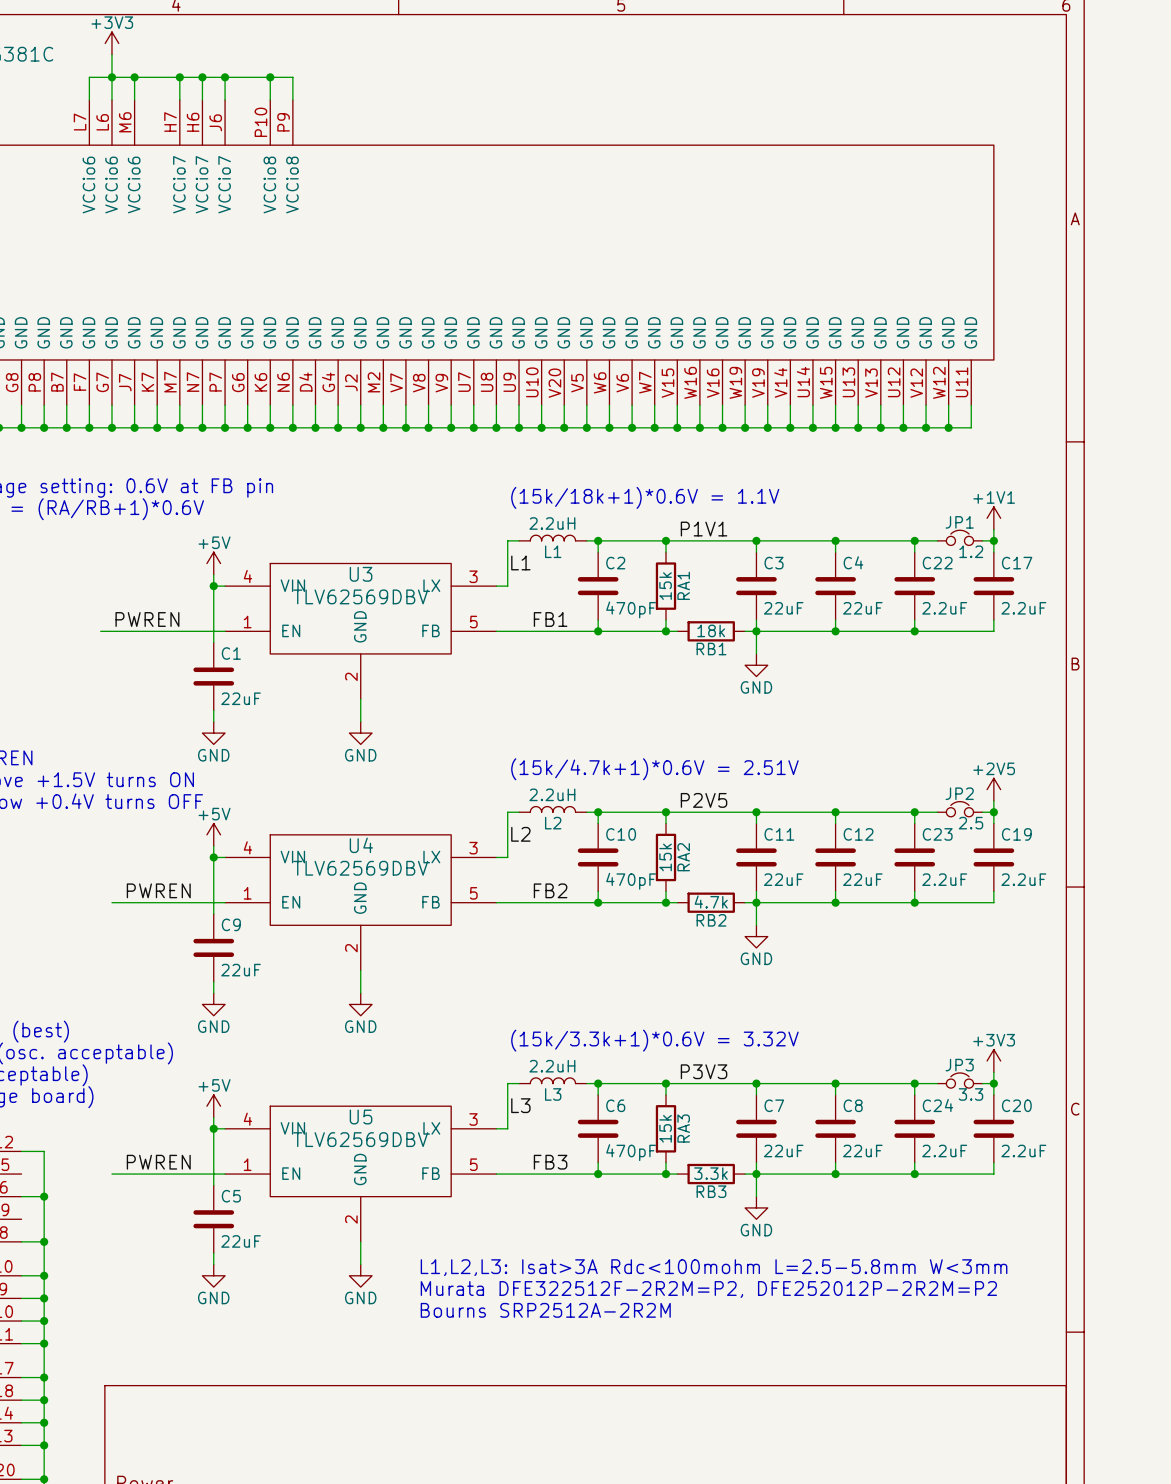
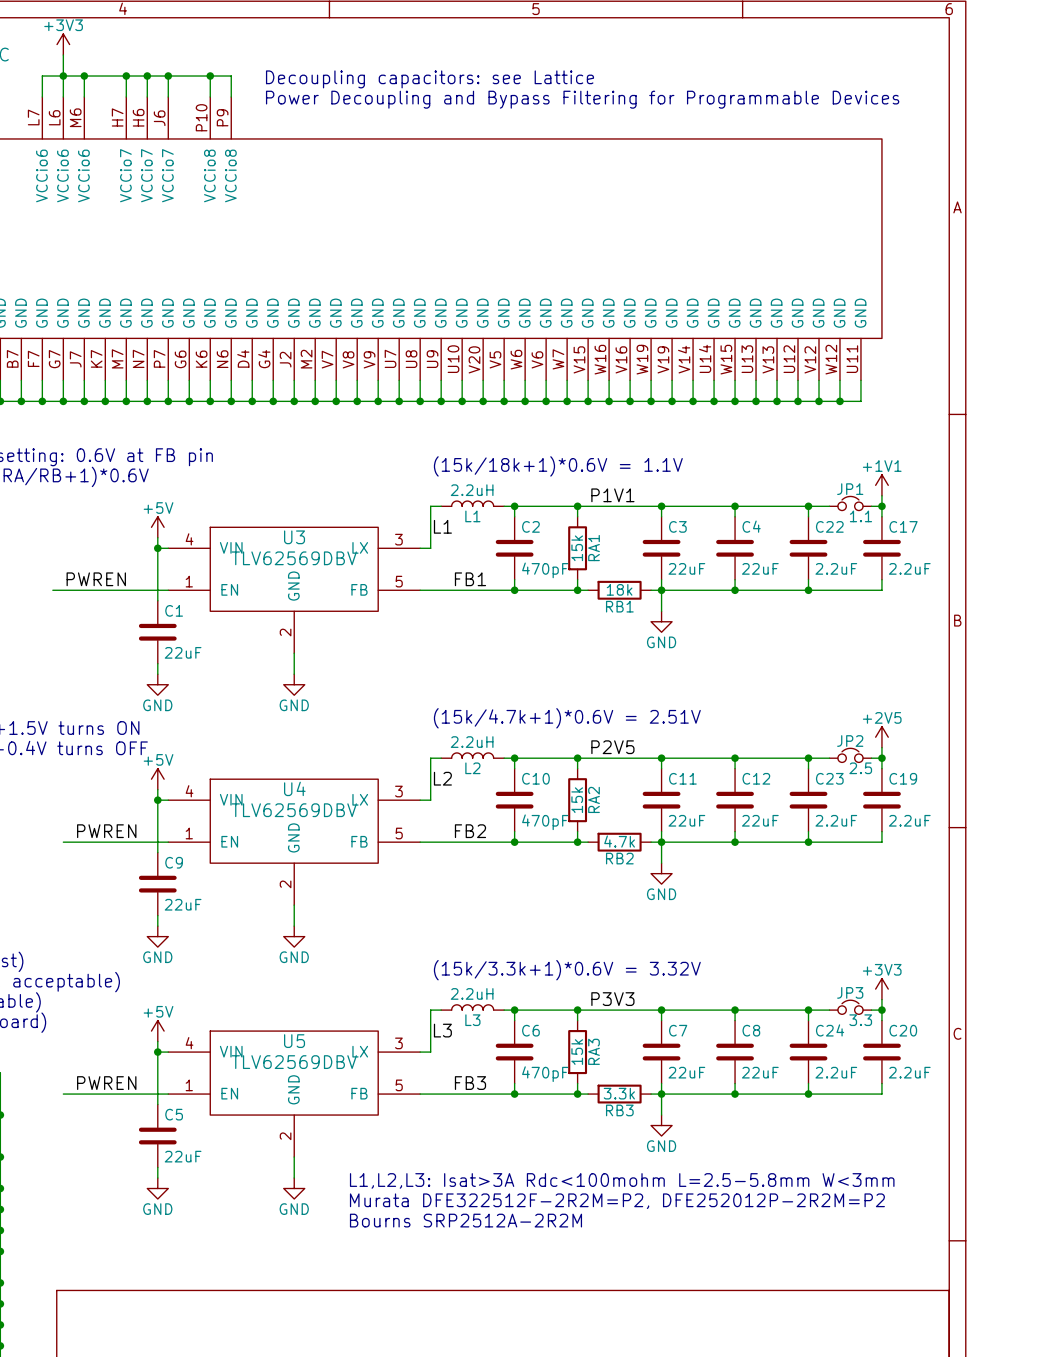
text: none -> Decoupling capacitors: see Lattice (430, 79)
text: none -> Power Decoupling and Bypass Filtering for Programmable Devices (582, 99)
JP1 value: 1.2 (971, 551) -> 1.1 (860, 516)

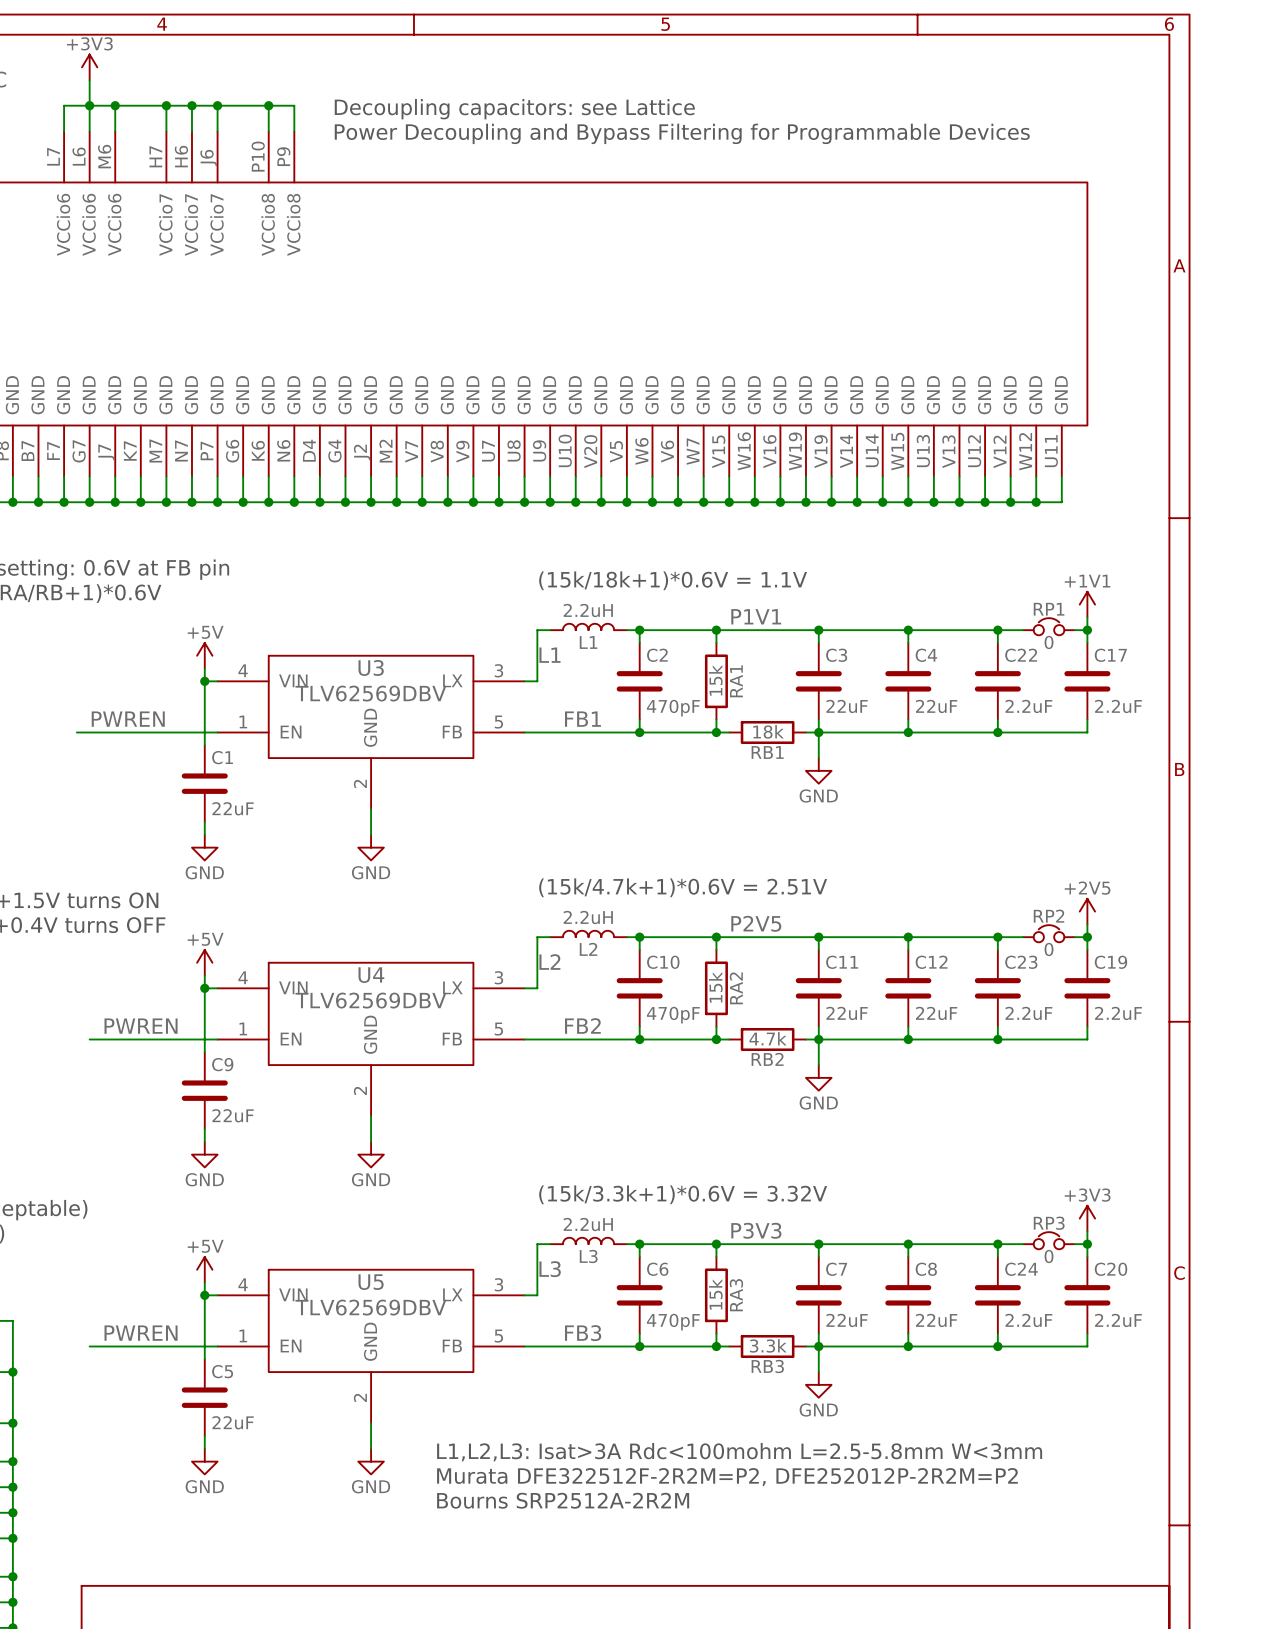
JP1 name: JP1 (850, 489) -> RP1 (1049, 609)
JP1 value: 1.1 (860, 516) -> 0 (1049, 642)
JP2 name: JP2 (850, 741) -> RP2 (1049, 916)
JP2 value: 2.5 (860, 768) -> 0 (1049, 949)
JP3 name: JP3 (850, 992) -> RP3 (1049, 1223)
JP3 value: 3.3 (860, 1020) -> 0 (1049, 1256)

